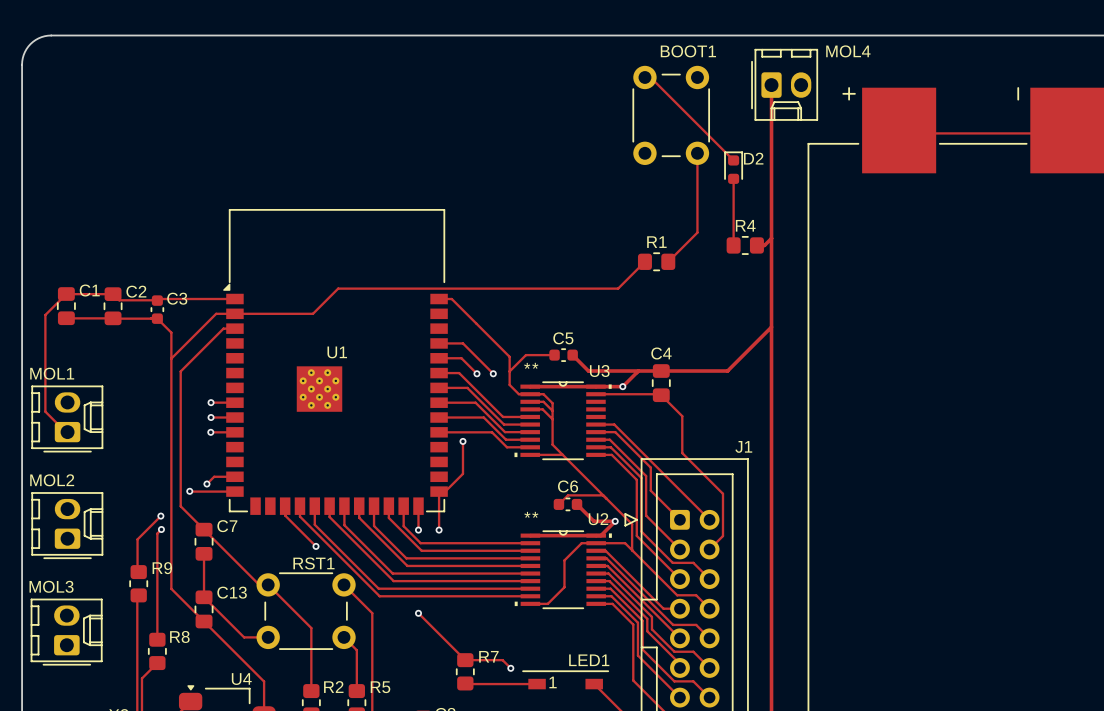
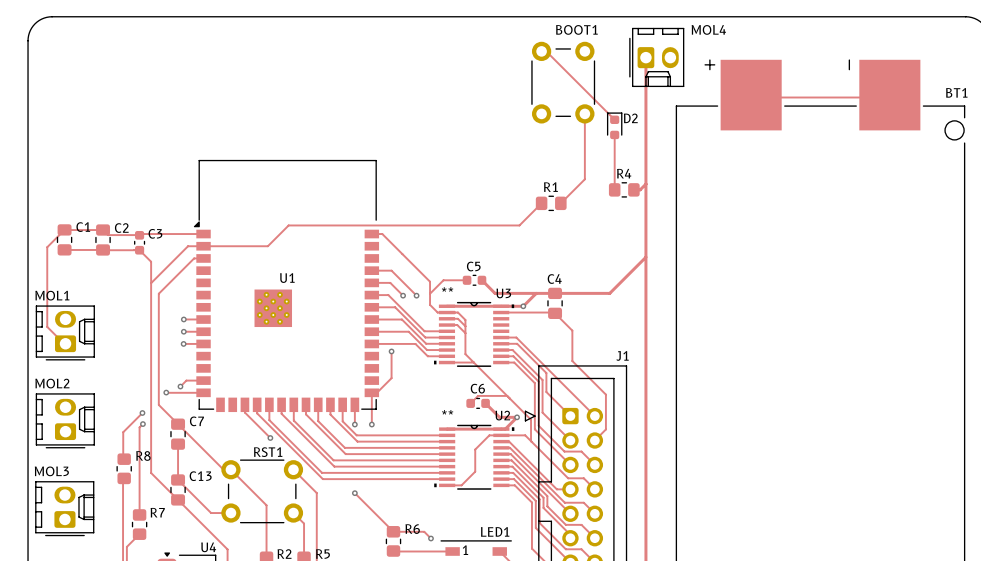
R9 name: R9 (162, 568) -> R8 (143, 455)
R8 name: R8 (179, 636) -> R7 (157, 512)
R7 name: R7 (488, 656) -> R6 (412, 529)

